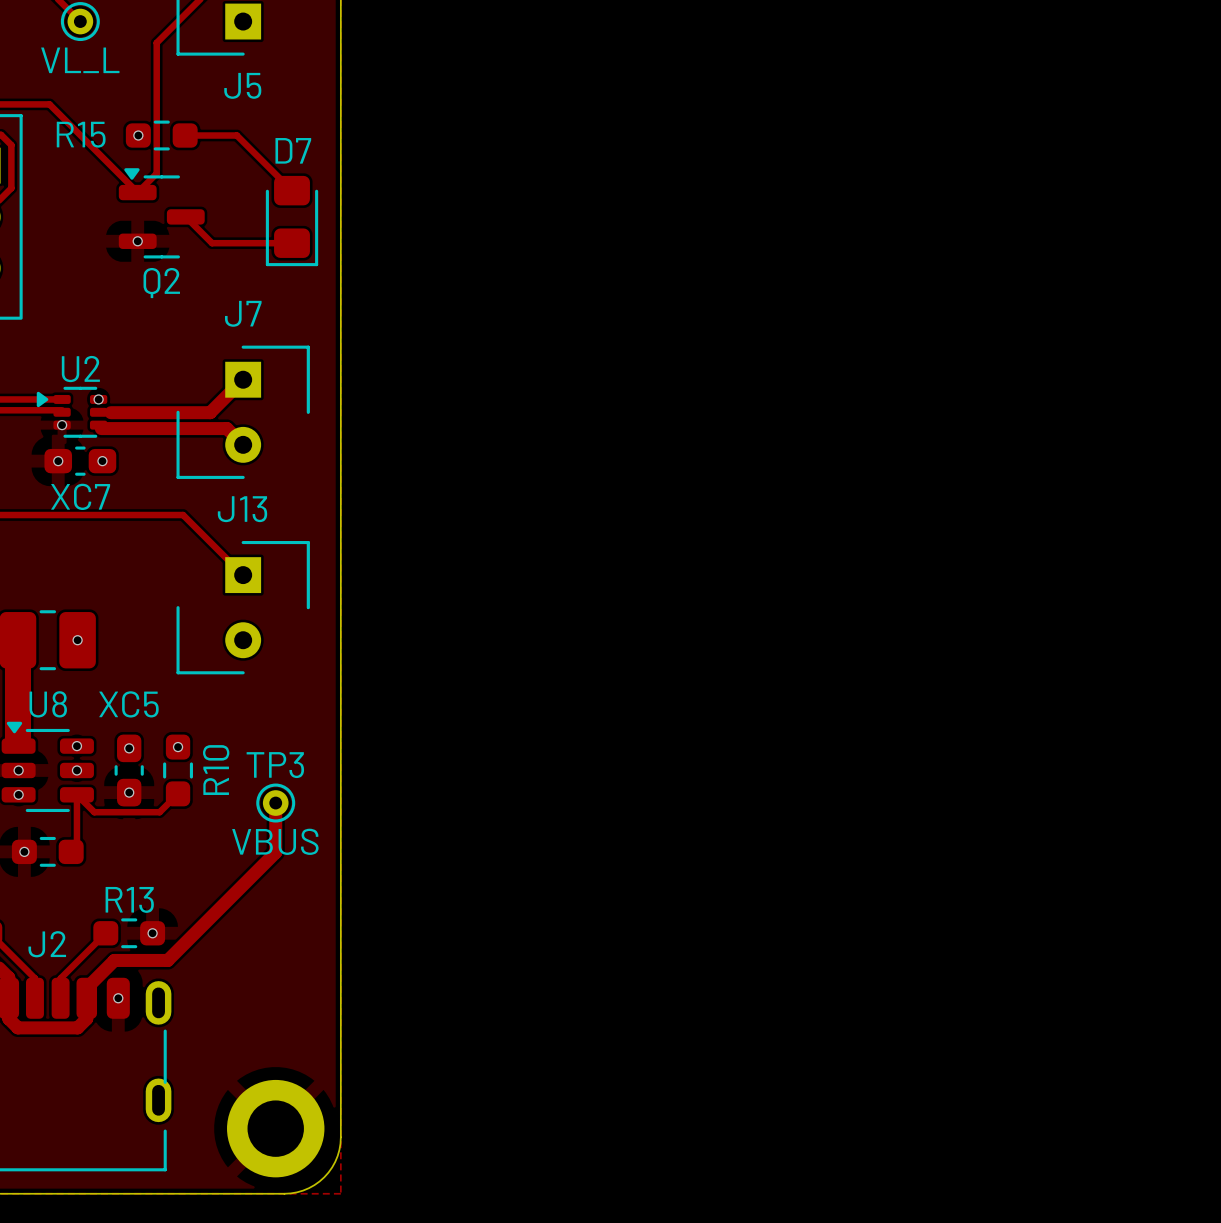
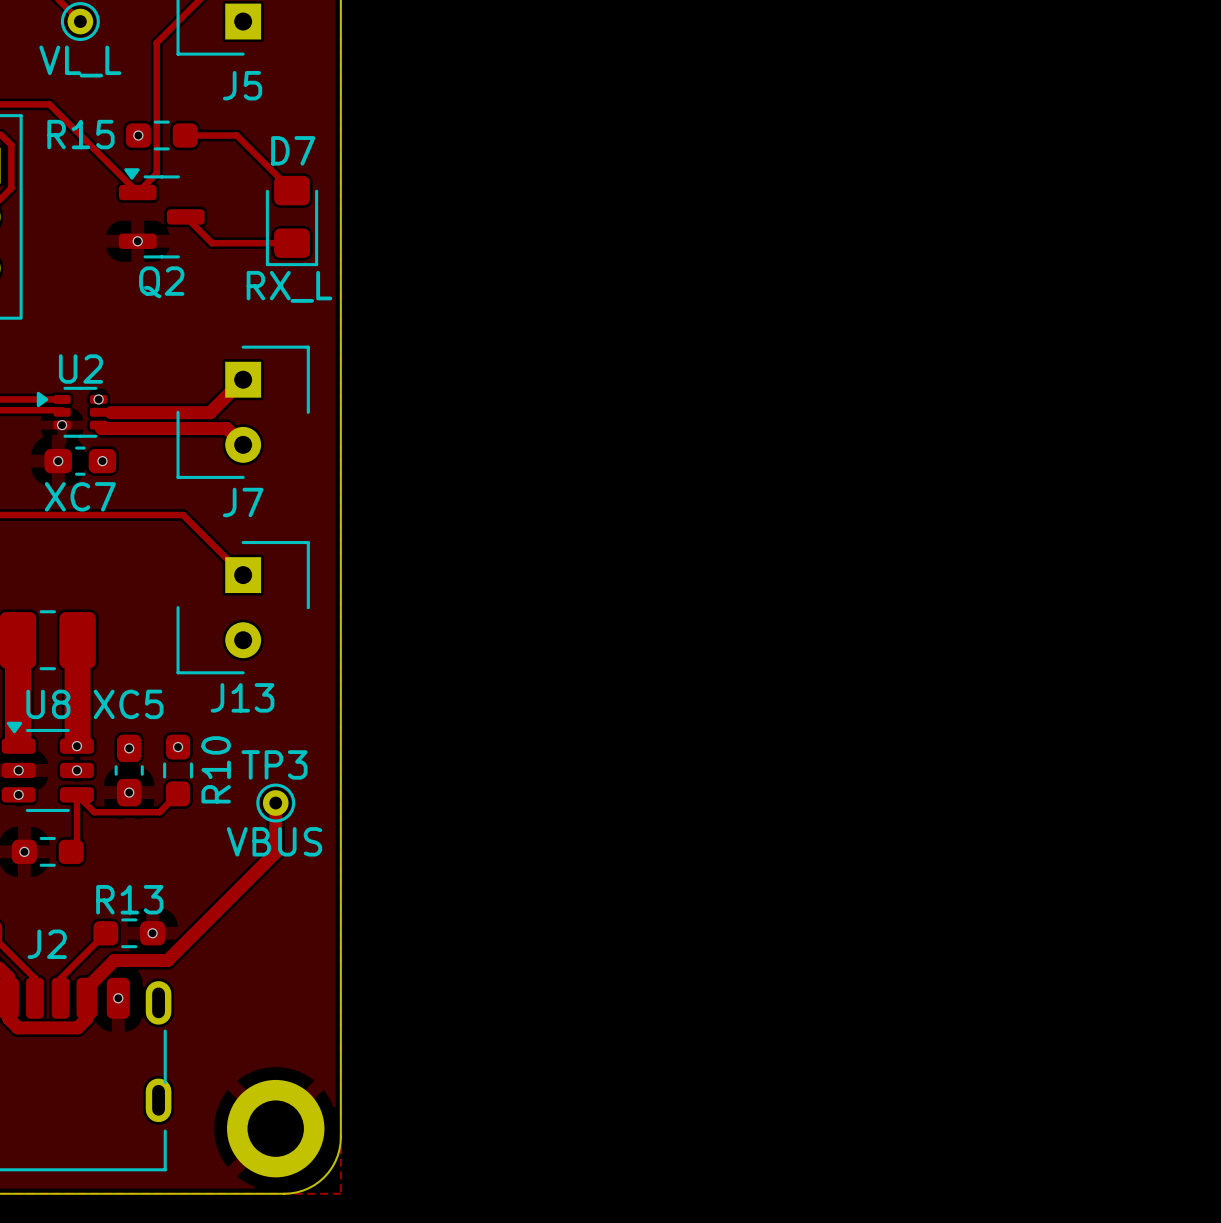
text: none -> RX_L (289, 286)
J7 name position: J7 (243, 313) -> J7 (243, 502)
J13 name position: J13 (242, 509) -> J13 (242, 697)
track: none -> (77, 640) (77, 737)
via: (77, 640) -> none

